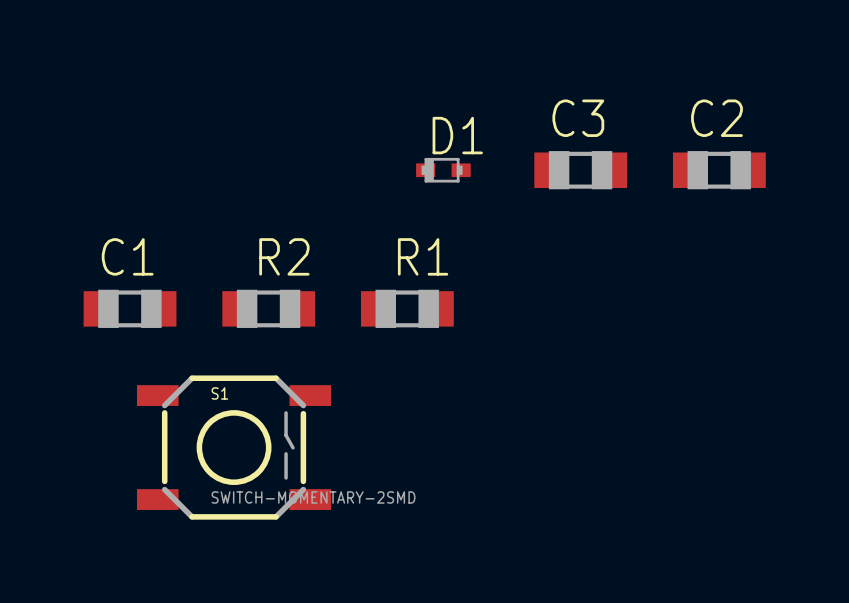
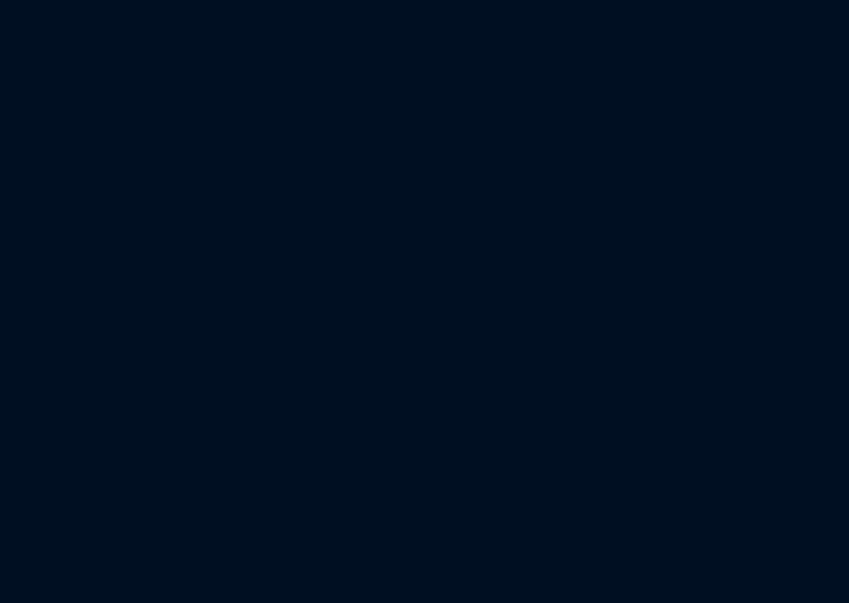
D1: (443, 170) -> none
C3: (580, 170) -> none
C2: (719, 170) -> none
C1: (130, 308) -> none
R2: (268, 308) -> none
R1: (407, 308) -> none
S1: SWITCH-MOMENTARY-2SMD (234, 447) -> none

